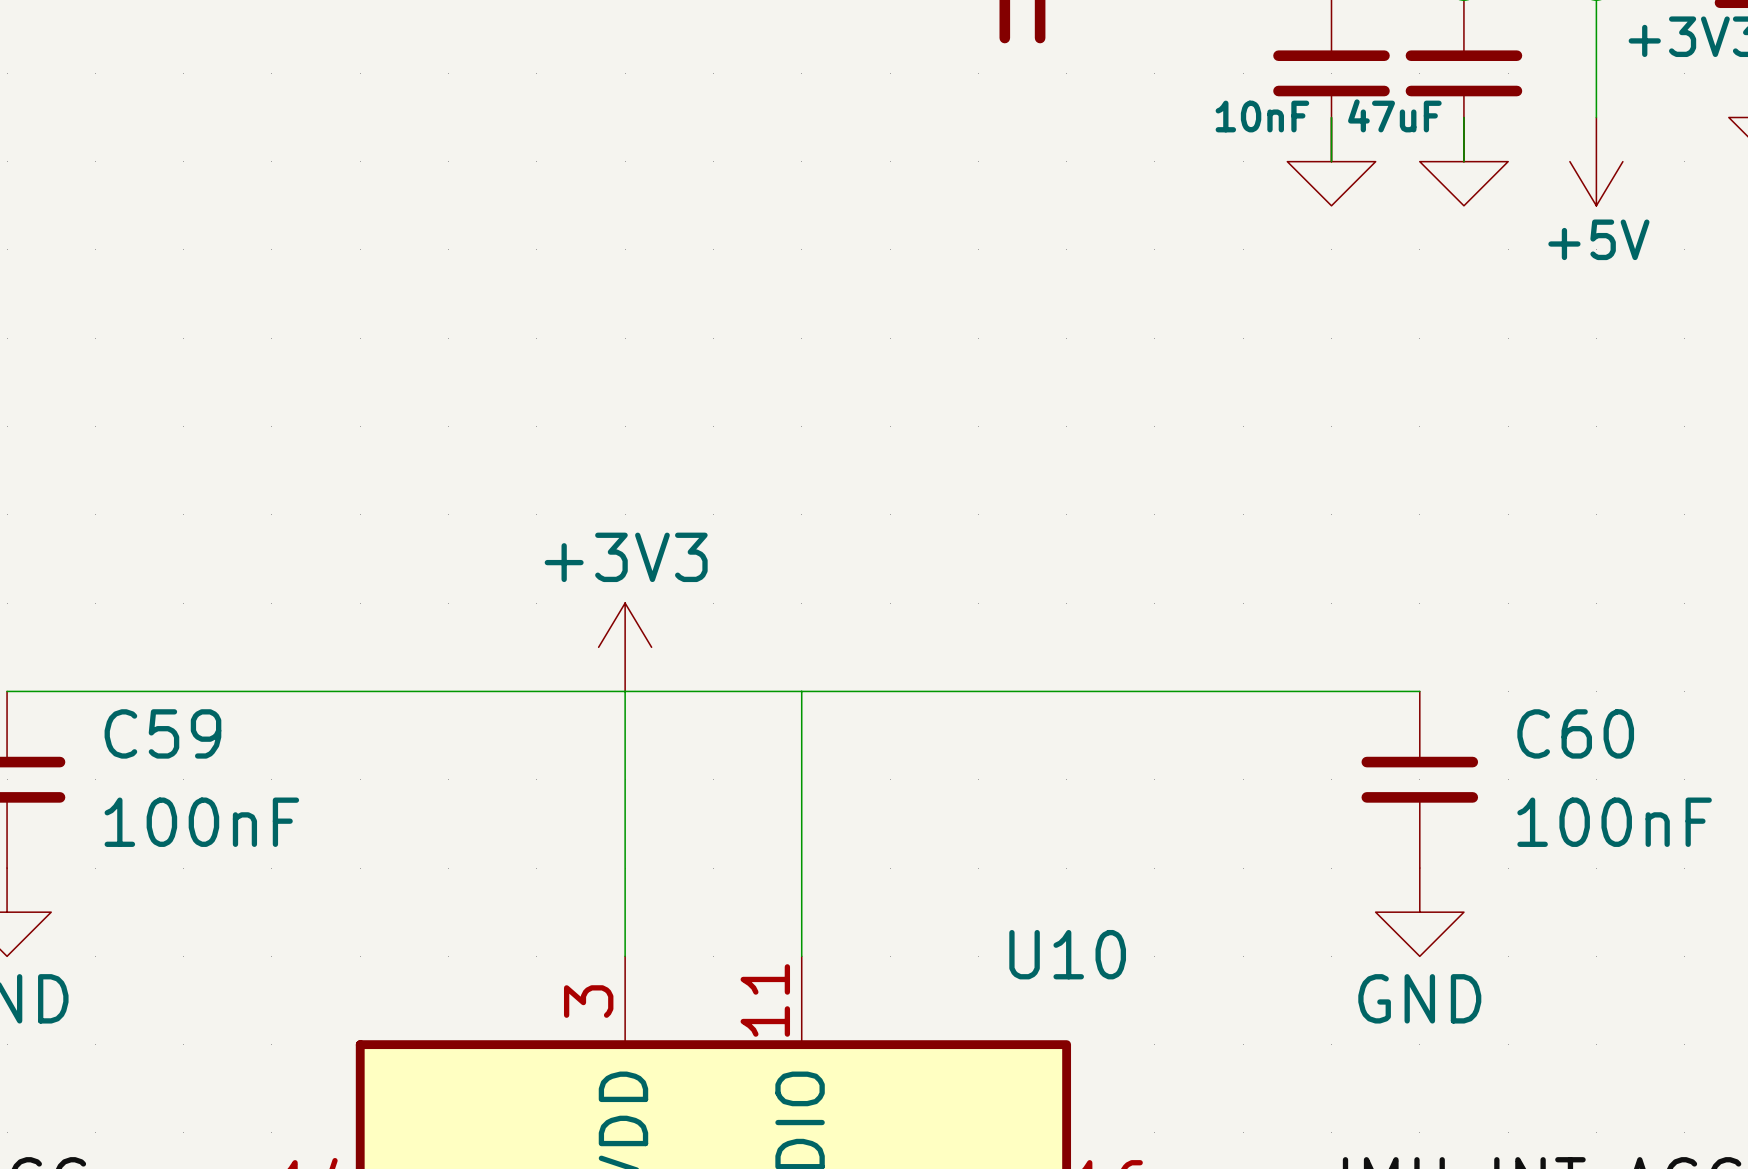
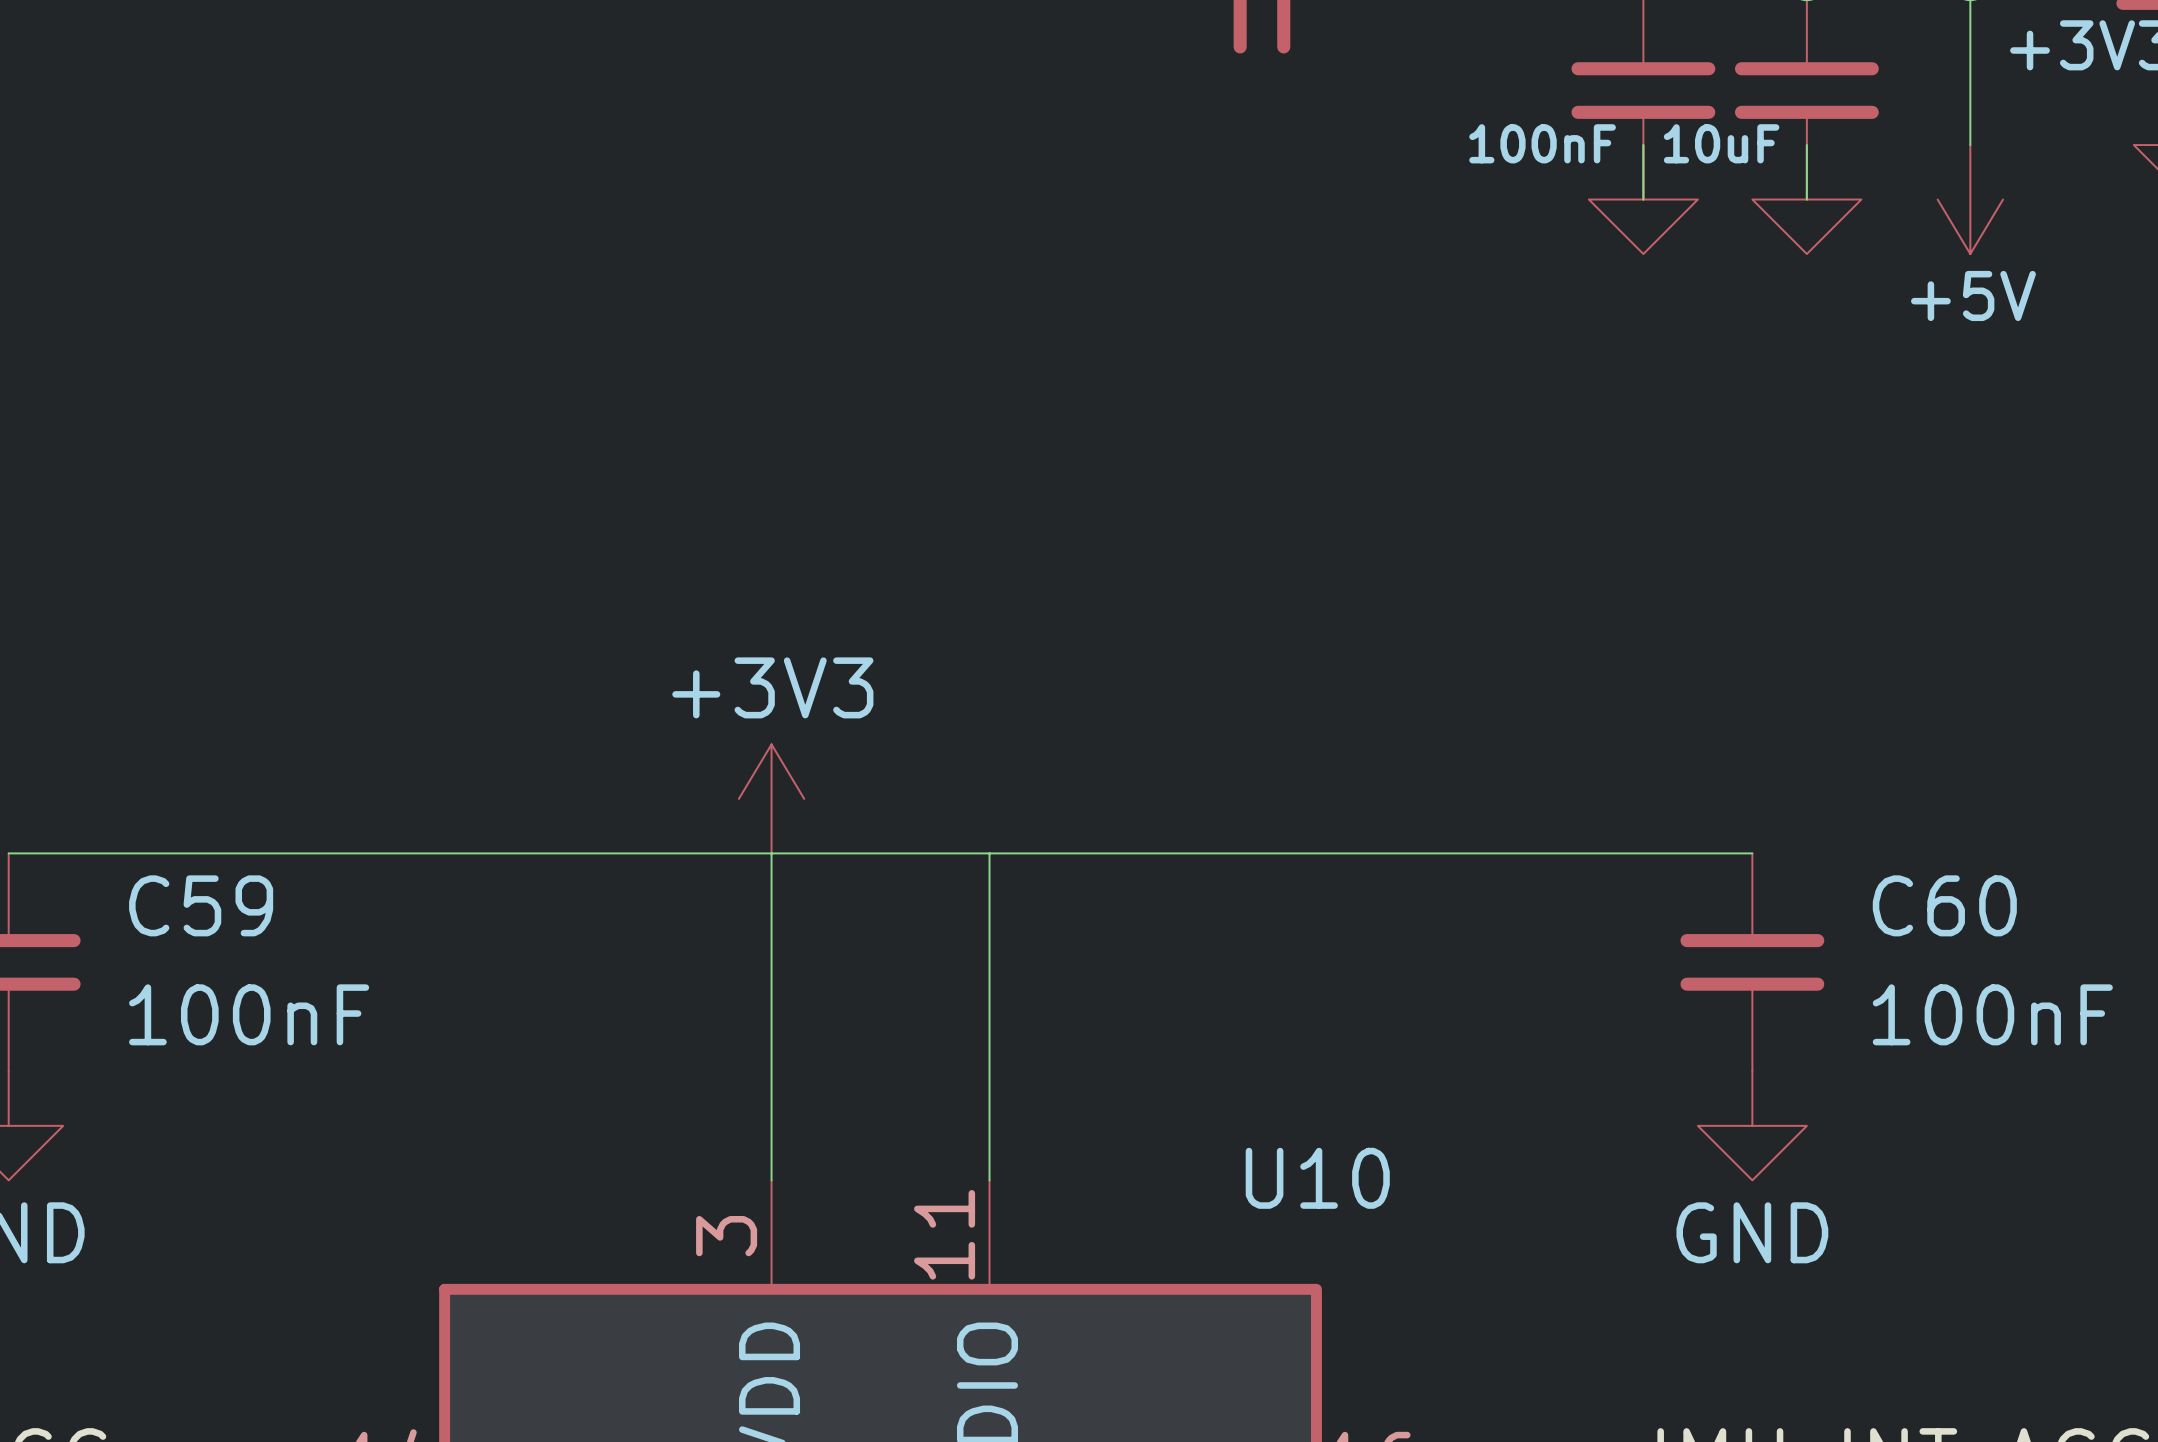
part value: 47uF (1394, 115) -> 10uF (1721, 143)
part value: 10nF (1262, 116) -> 100nF (1542, 143)

